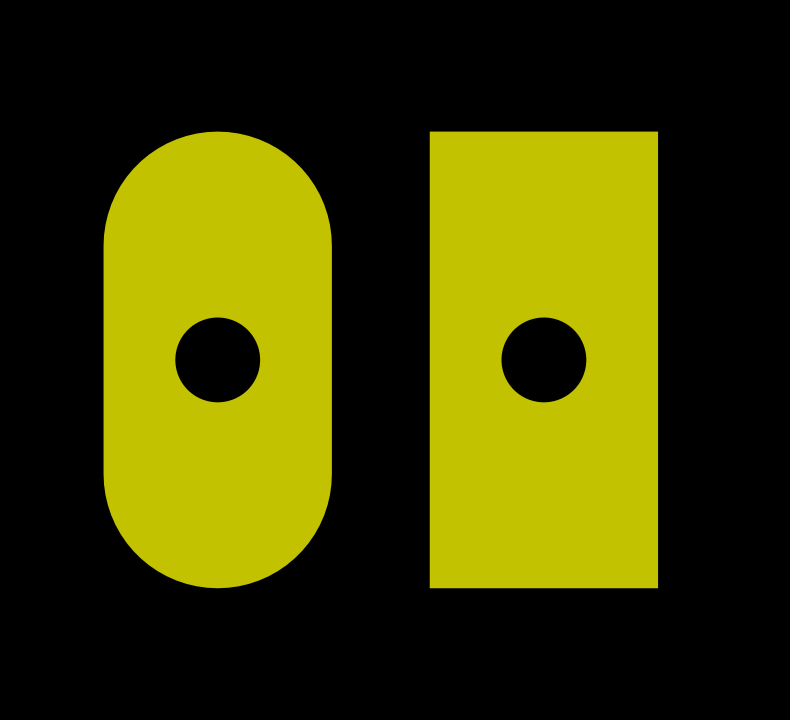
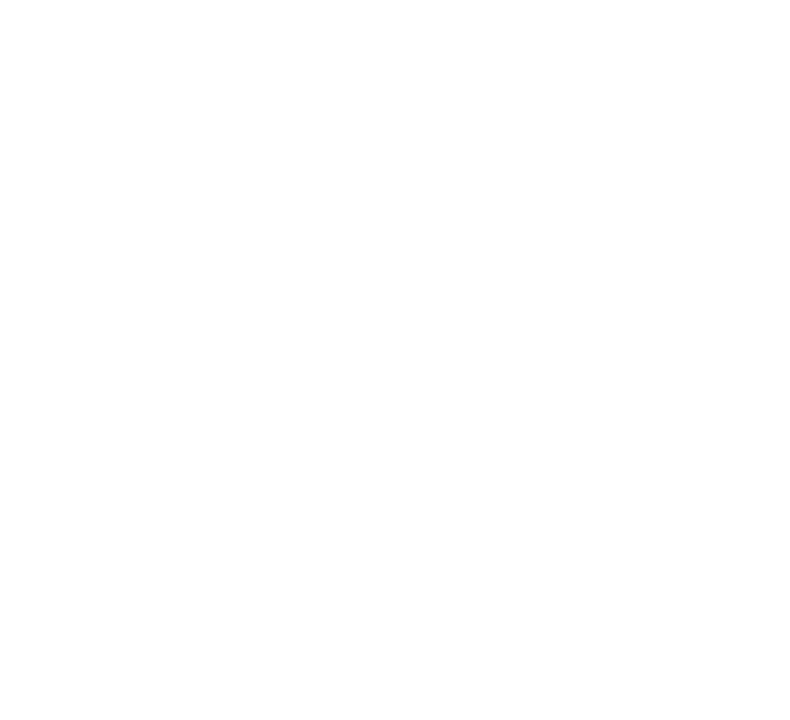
part: (380, 359) -> none

